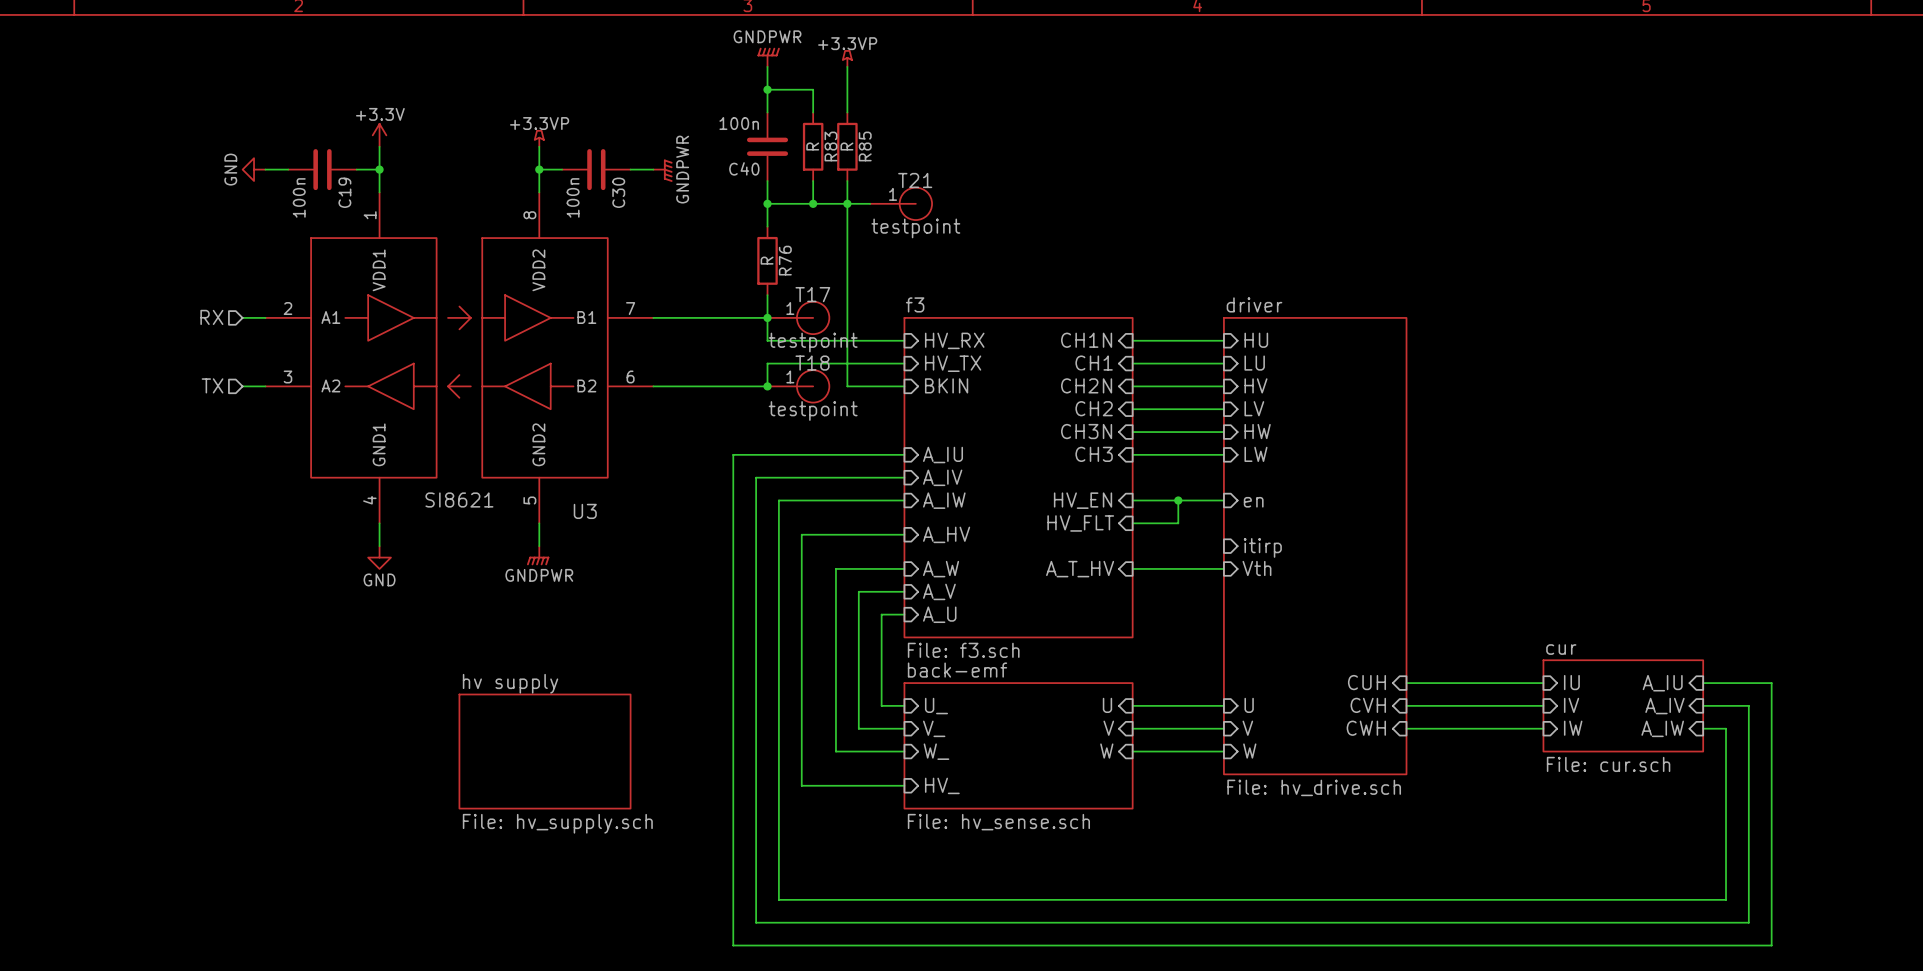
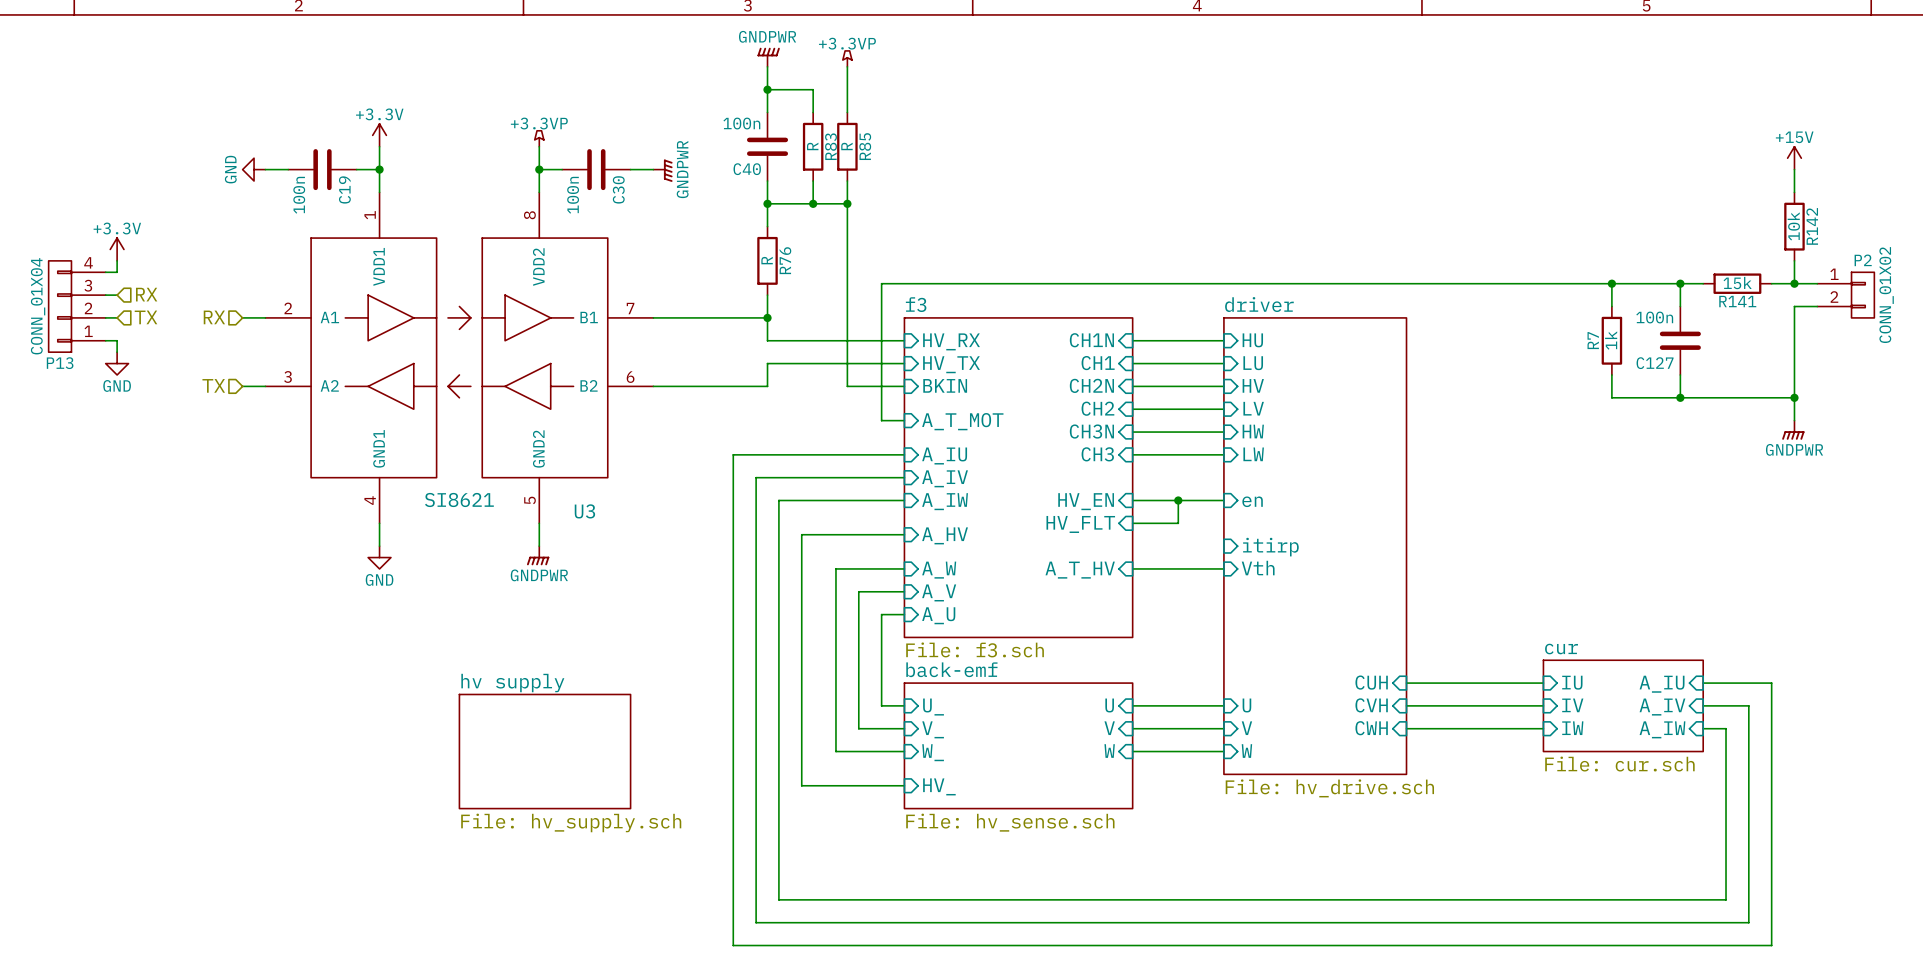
power symbol: none -> +15V (1794, 158)
wire: none -> (1794, 169) (1794, 192)
wire: (847, 203) (870, 203) -> none
T21: testpoint (901, 203) -> none
R142: none -> 10k (1794, 226)
power symbol: none -> +3.3V (117, 249)
wire: none -> (117, 260) (117, 272) (105, 272)
wire: none -> (1794, 260) (1794, 283)
wire: none -> (1611, 283) (1611, 306)
junction: none -> (1611, 283)
wire: none -> (1680, 283) (1680, 306)
junction: none -> (1680, 283)
wire: none -> (1703, 283) (881, 283) (881, 420) (904, 420)
R141: none -> 15k (1737, 283)
wire: none -> (1771, 283) (1817, 283)
junction: none -> (1794, 283)
hierarchical label: none -> RX (146, 294)
wire: none -> (105, 295) (117, 295)
P2: none -> CONN_01X02 (1845, 295)
P13: none -> CONN_01X04 (77, 306)
wire: none -> (1817, 306) (1794, 306) (1794, 420)
wire: none -> (105, 317) (117, 317)
hierarchical label: none -> TX (145, 317)
T17: testpoint (798, 317) -> none
wire: none -> (105, 340) (117, 340) (117, 352)
R7: none -> 1k (1611, 340)
C127: none -> 100n (1680, 340)
power symbol: none -> GND (117, 363)
wire: none -> (1611, 374) (1611, 397) (1794, 397)
wire: none -> (1680, 374) (1680, 397)
junction: (767, 386) -> none
T18: testpoint (798, 386) -> none
junction: none -> (1680, 397)
junction: none -> (1794, 397)
sheet pin: none -> A_T_MOT (962, 421)
power symbol: none -> GNDPWR (1793, 430)

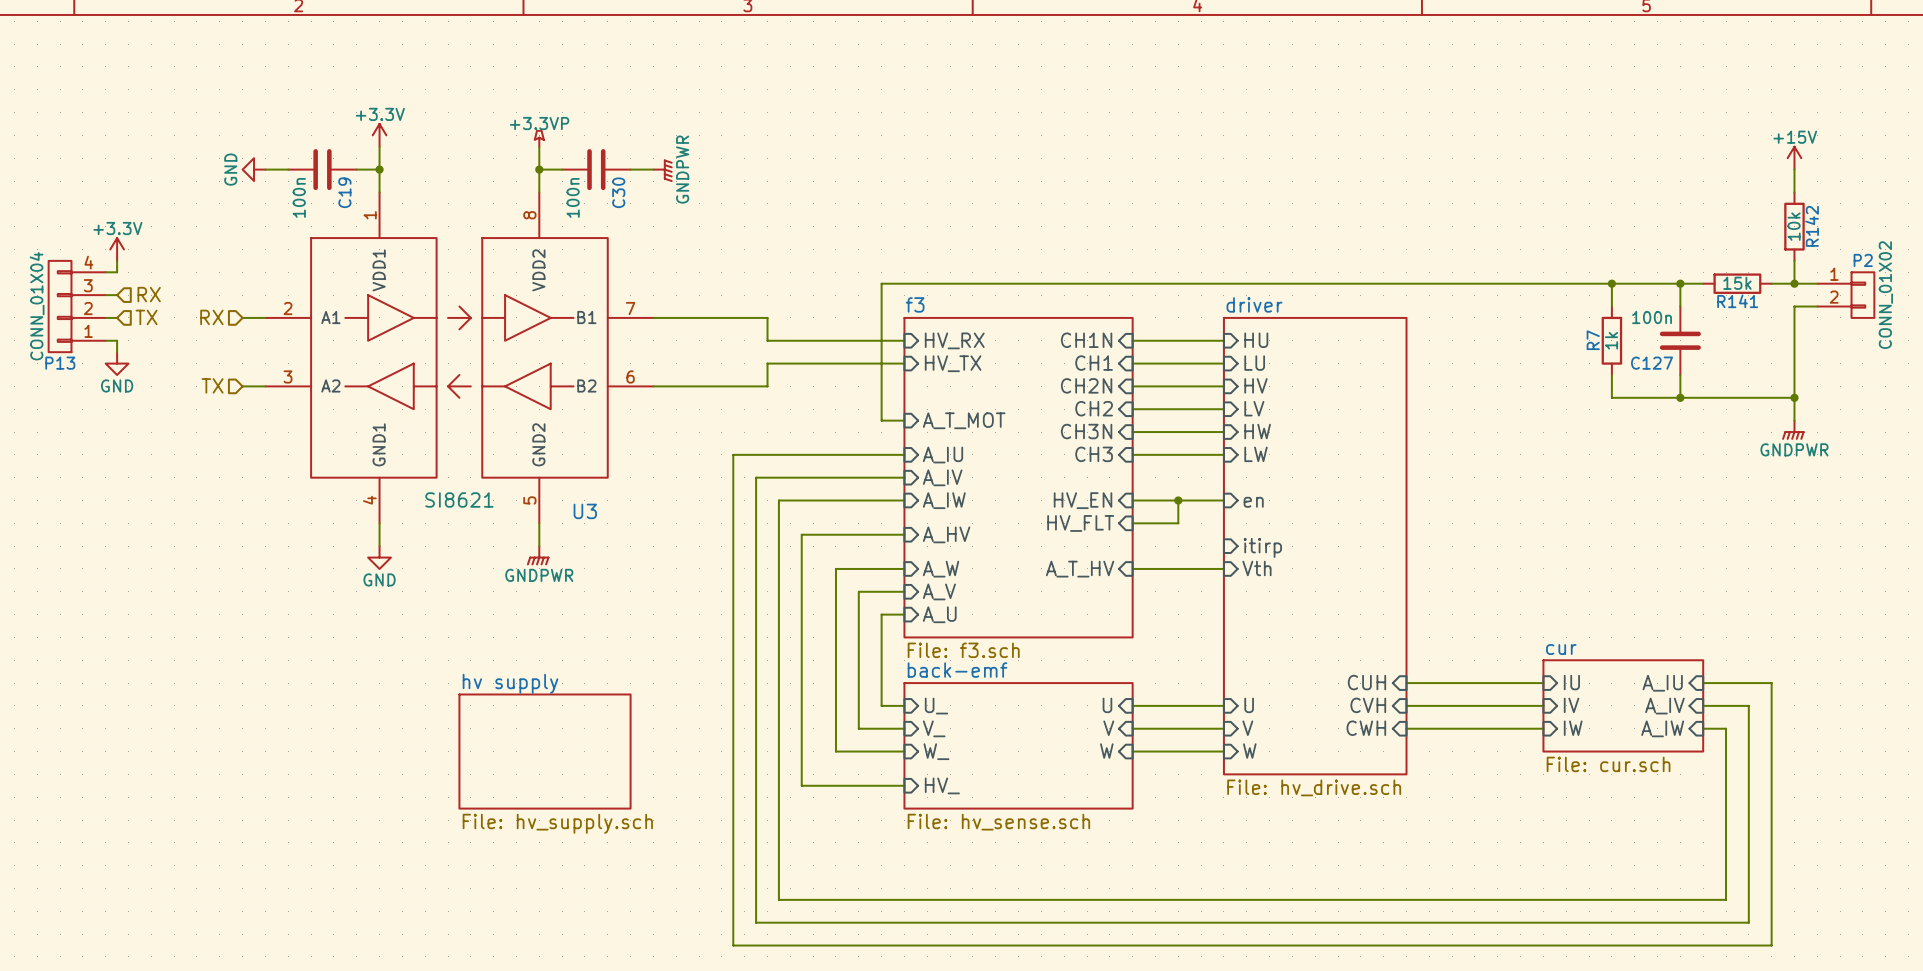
power symbol: GNDPWR (768, 57) -> none
power symbol: +3.3VP (847, 58) -> none
wire: (767, 66) (767, 112) -> none
wire: (847, 66) (847, 112) -> none
wire: (767, 89) (813, 89) (813, 112) -> none
junction: (767, 89) -> none
C40: 100n (767, 146) -> none
R83: R (813, 146) -> none
R85: R (847, 146) -> none
wire: (767, 181) (767, 226) -> none
wire: (813, 181) (813, 203) -> none
wire: (847, 181) (847, 386) (904, 386) -> none
wire: (767, 203) (847, 203) -> none
junction: (767, 203) -> none
junction: (813, 203) -> none
junction: (847, 203) -> none
R76: R (767, 260) -> none
wire: (767, 295) (767, 317) -> none
junction: (767, 317) -> none
sheet pin: BKIN (945, 385) -> none

